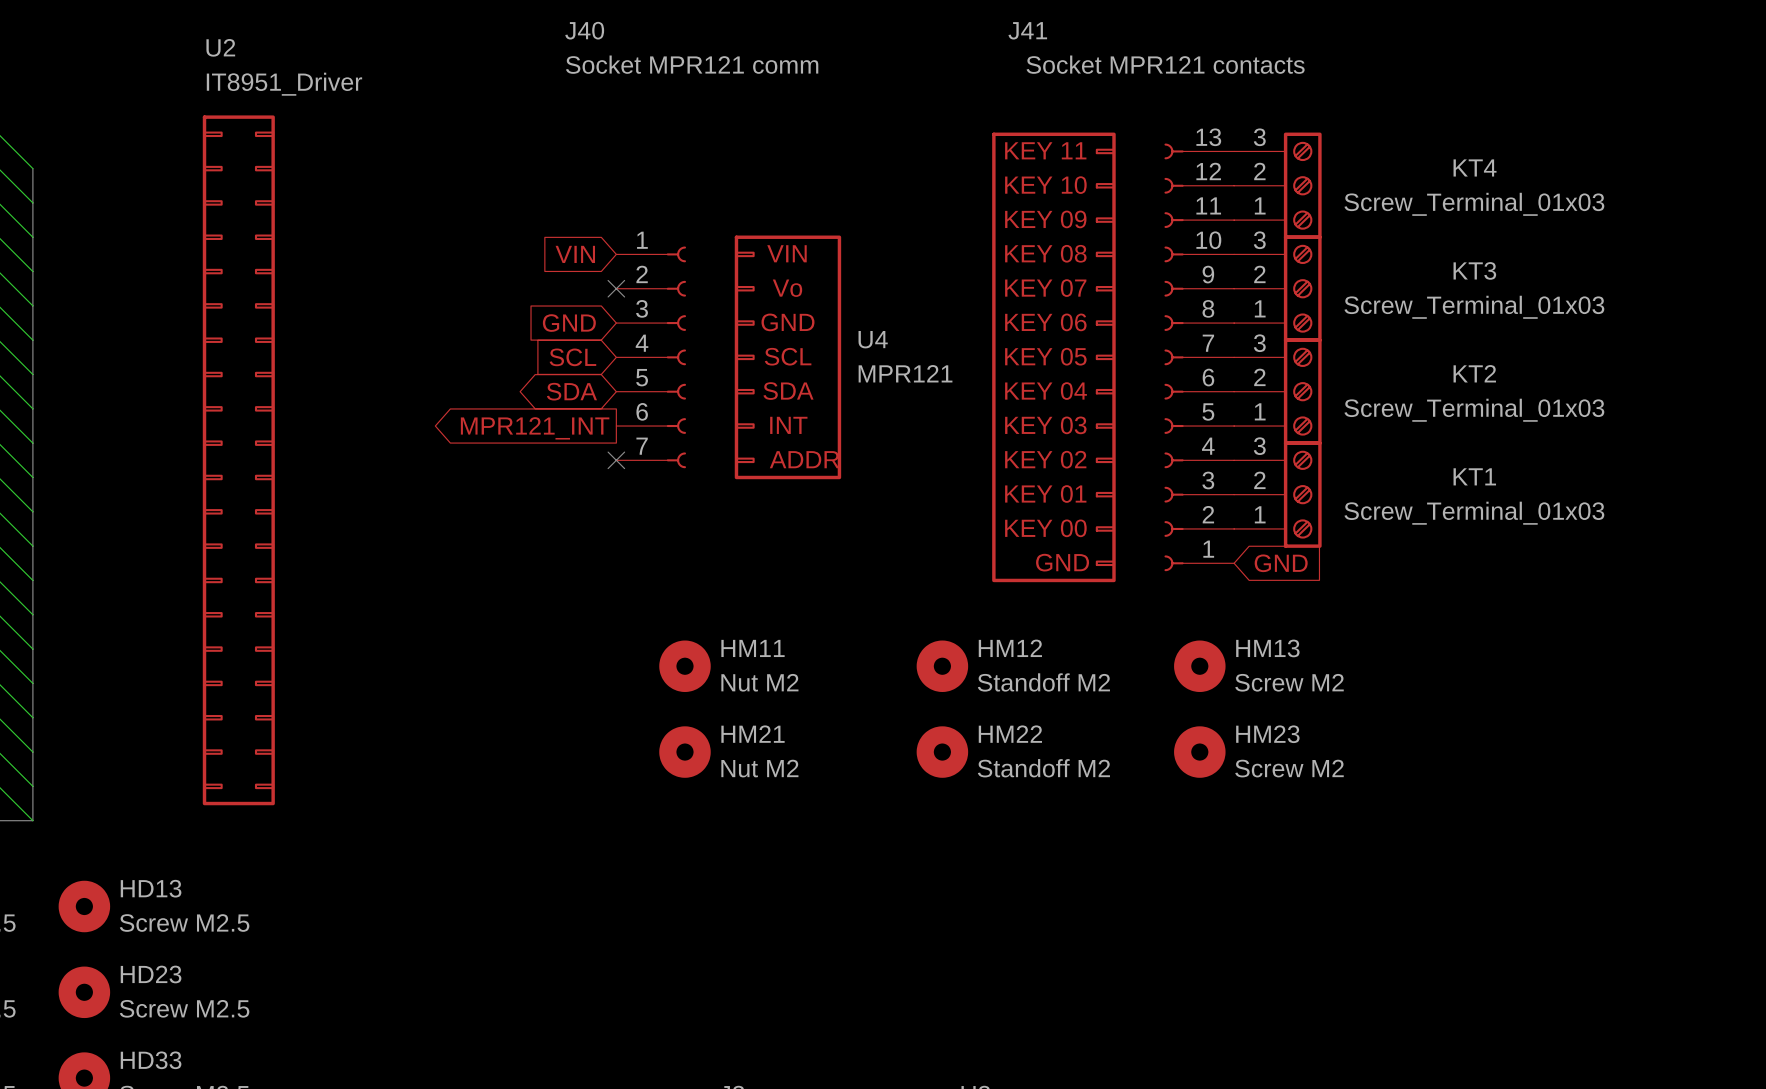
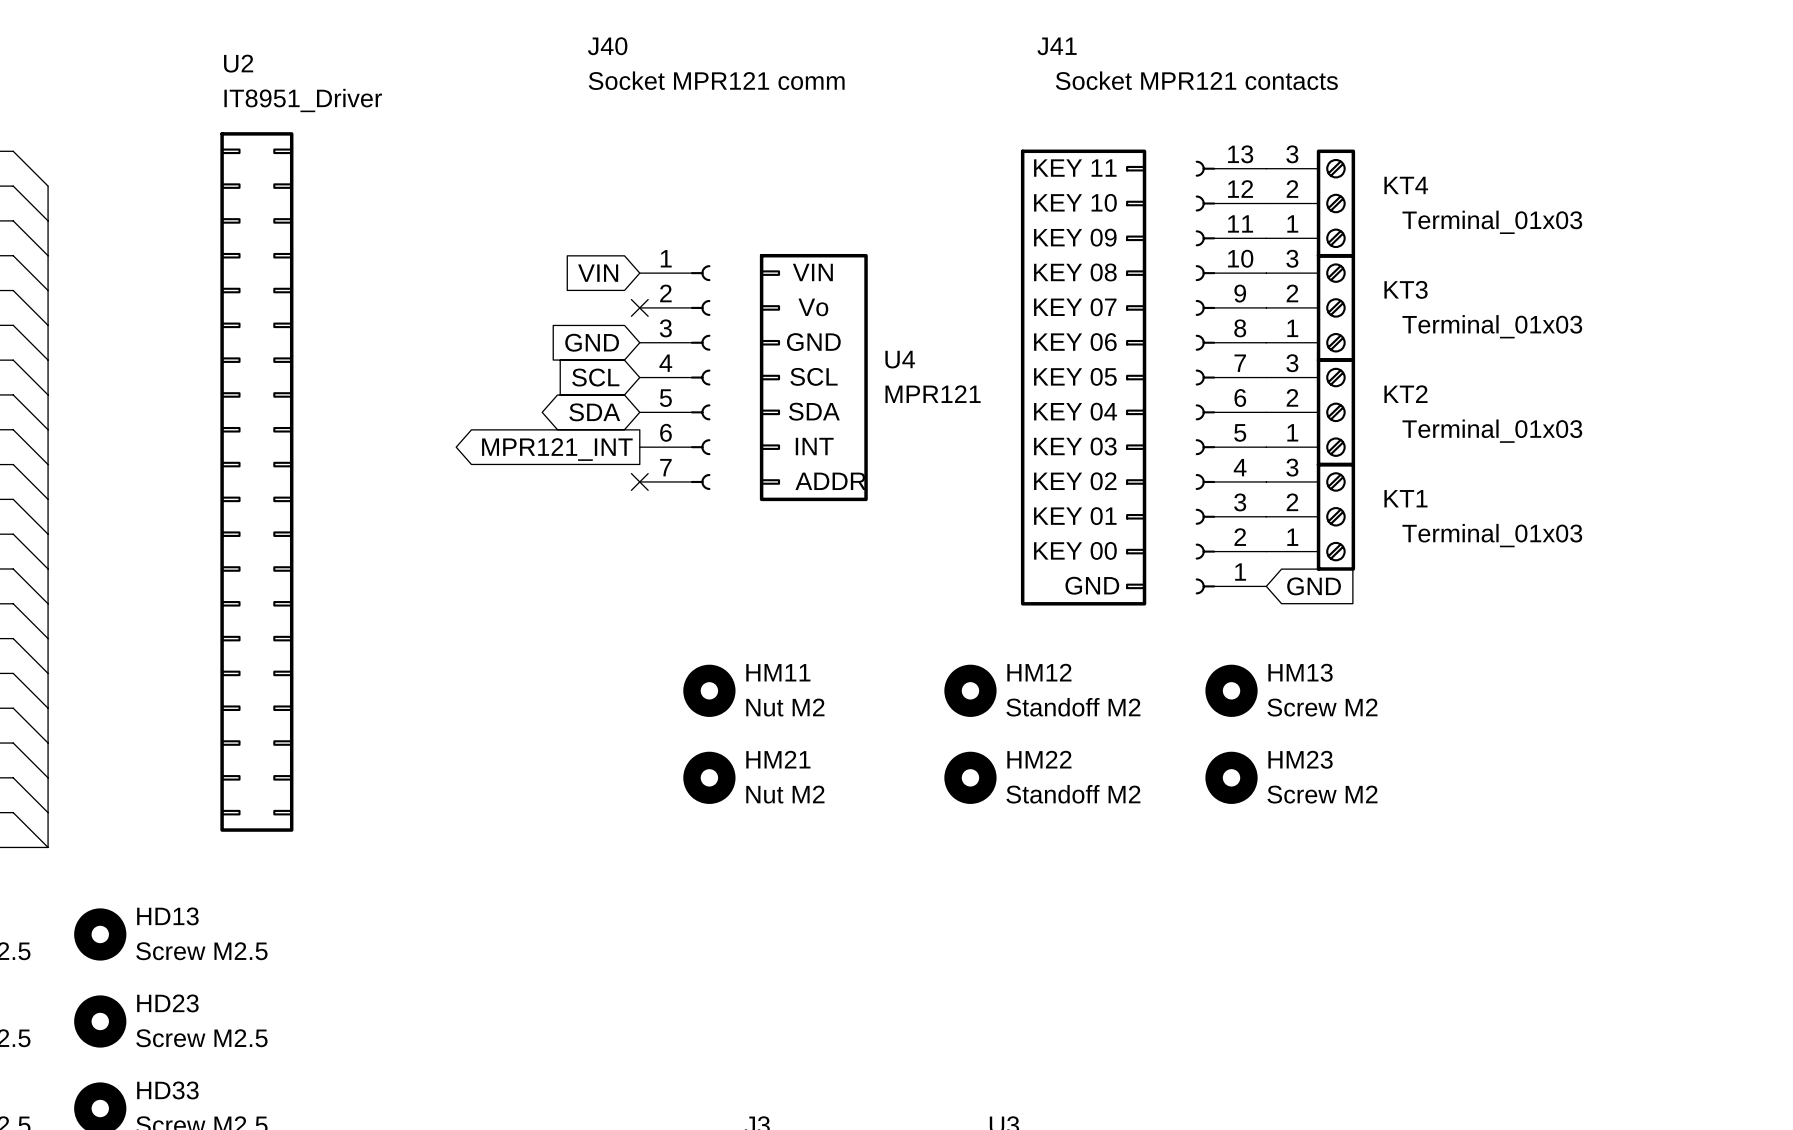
KT4 name position: KT4 (1475, 167) -> KT4 (1406, 185)
KT4 value: Screw_Terminal_01x03 (1474, 204) -> Terminal_01x03 (1492, 222)
KT3 name position: KT3 (1474, 270) -> KT3 (1406, 289)
KT3 value: Screw_Terminal_01x03 (1474, 307) -> Terminal_01x03 (1492, 326)
KT2 name position: KT2 (1474, 373) -> KT2 (1405, 394)
KT2 value: Screw_Terminal_01x03 (1474, 410) -> Terminal_01x03 (1492, 431)
KT1 name position: KT1 (1474, 476) -> KT1 (1405, 498)
KT1 value: Screw_Terminal_01x03 (1474, 513) -> Terminal_01x03 (1492, 535)

